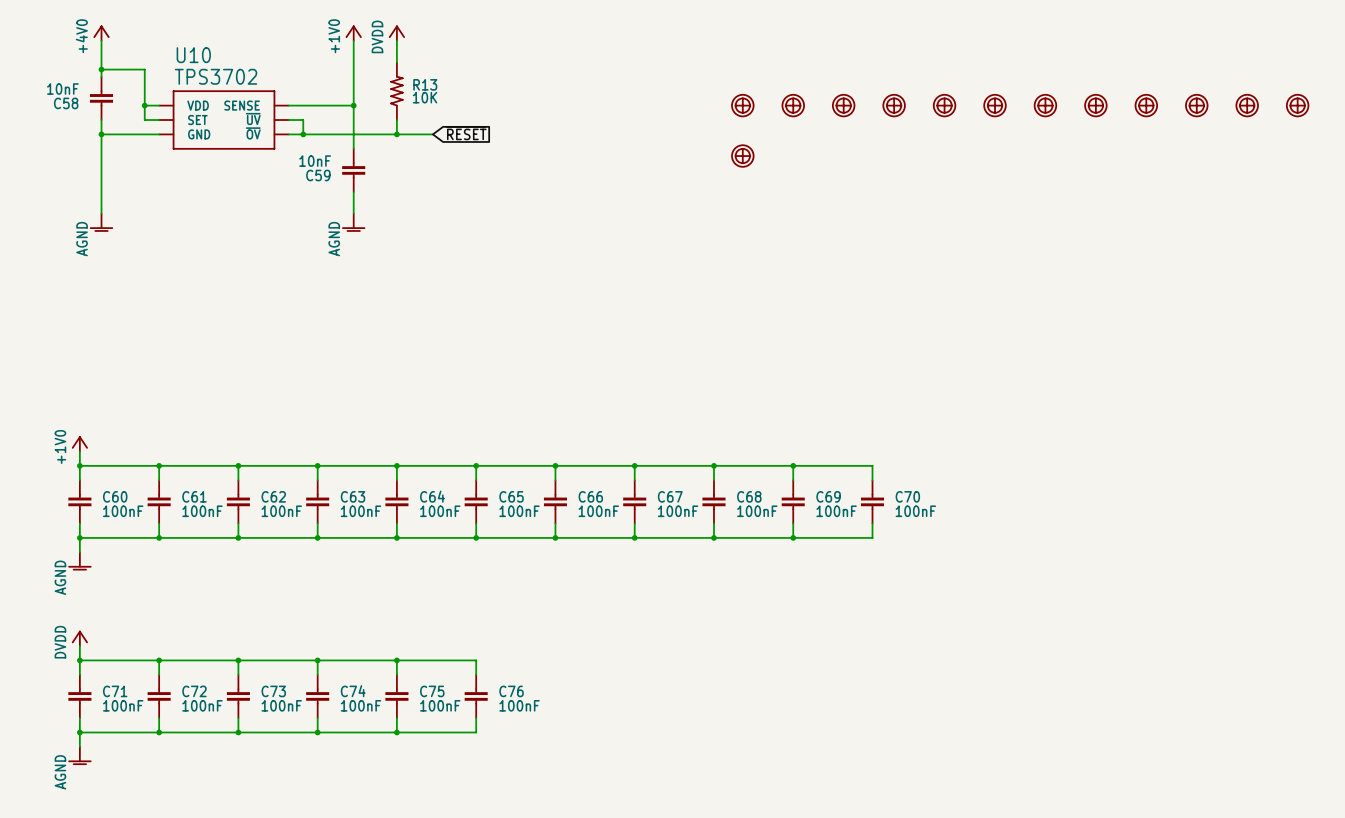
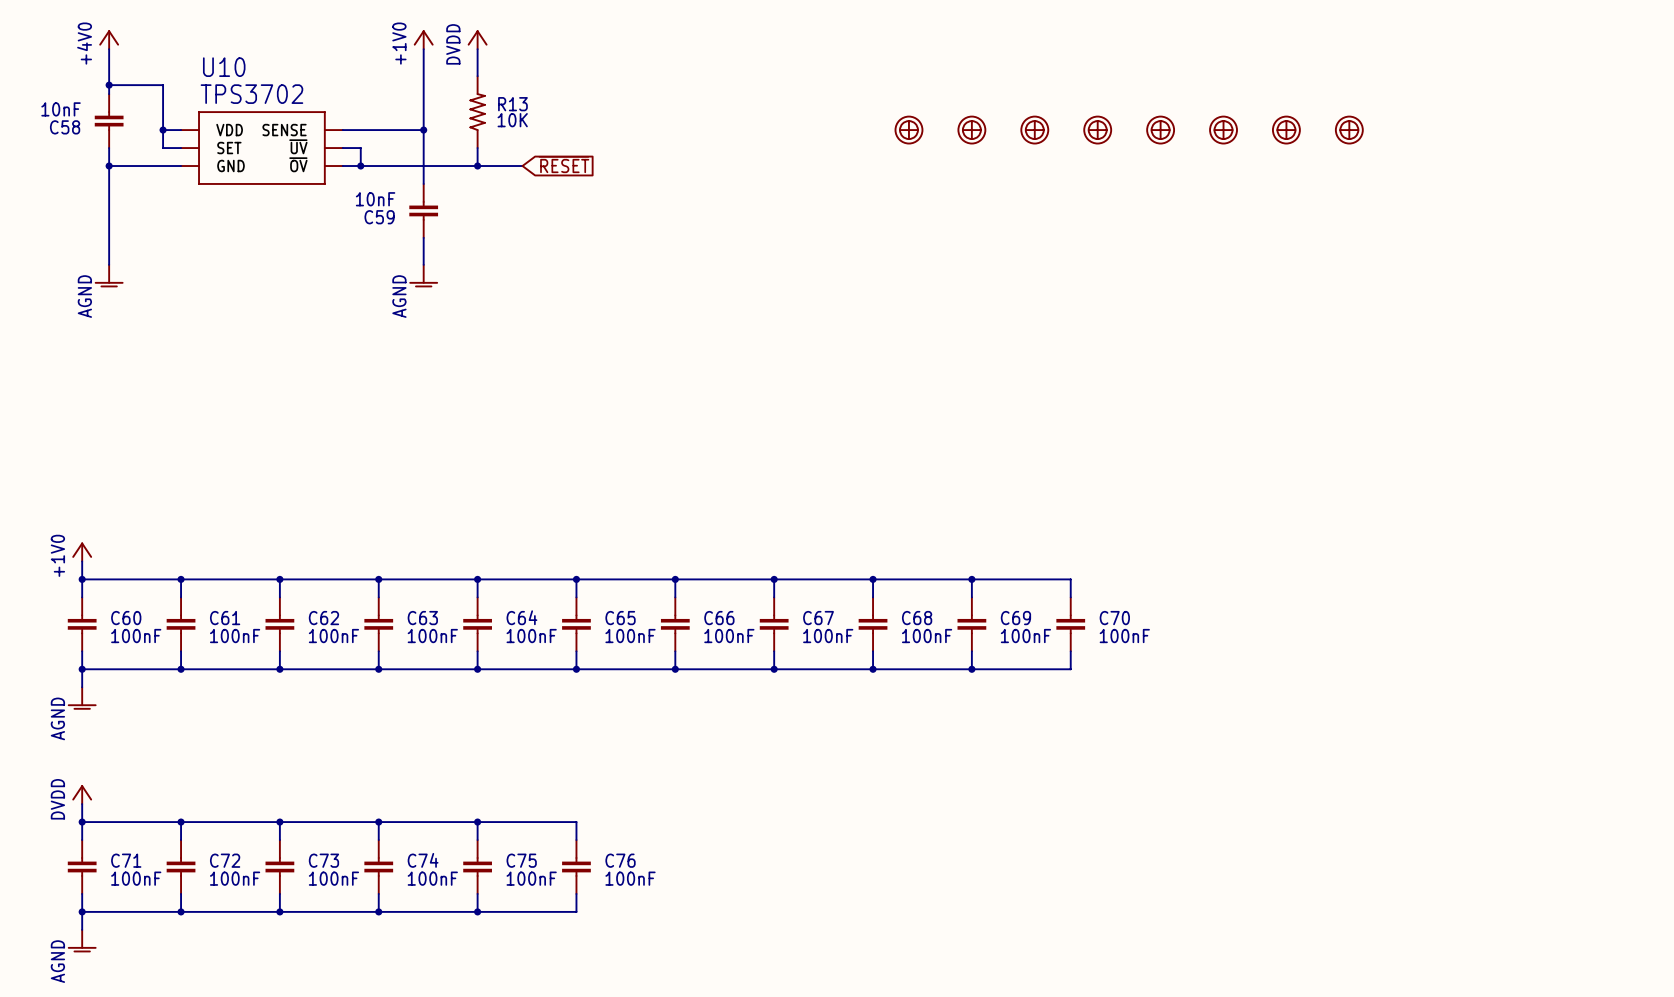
part: (1146, 105) -> none
part: (1196, 105) -> none
part: (1247, 105) -> none
part: (1297, 105) -> none
part: (742, 156) -> none

